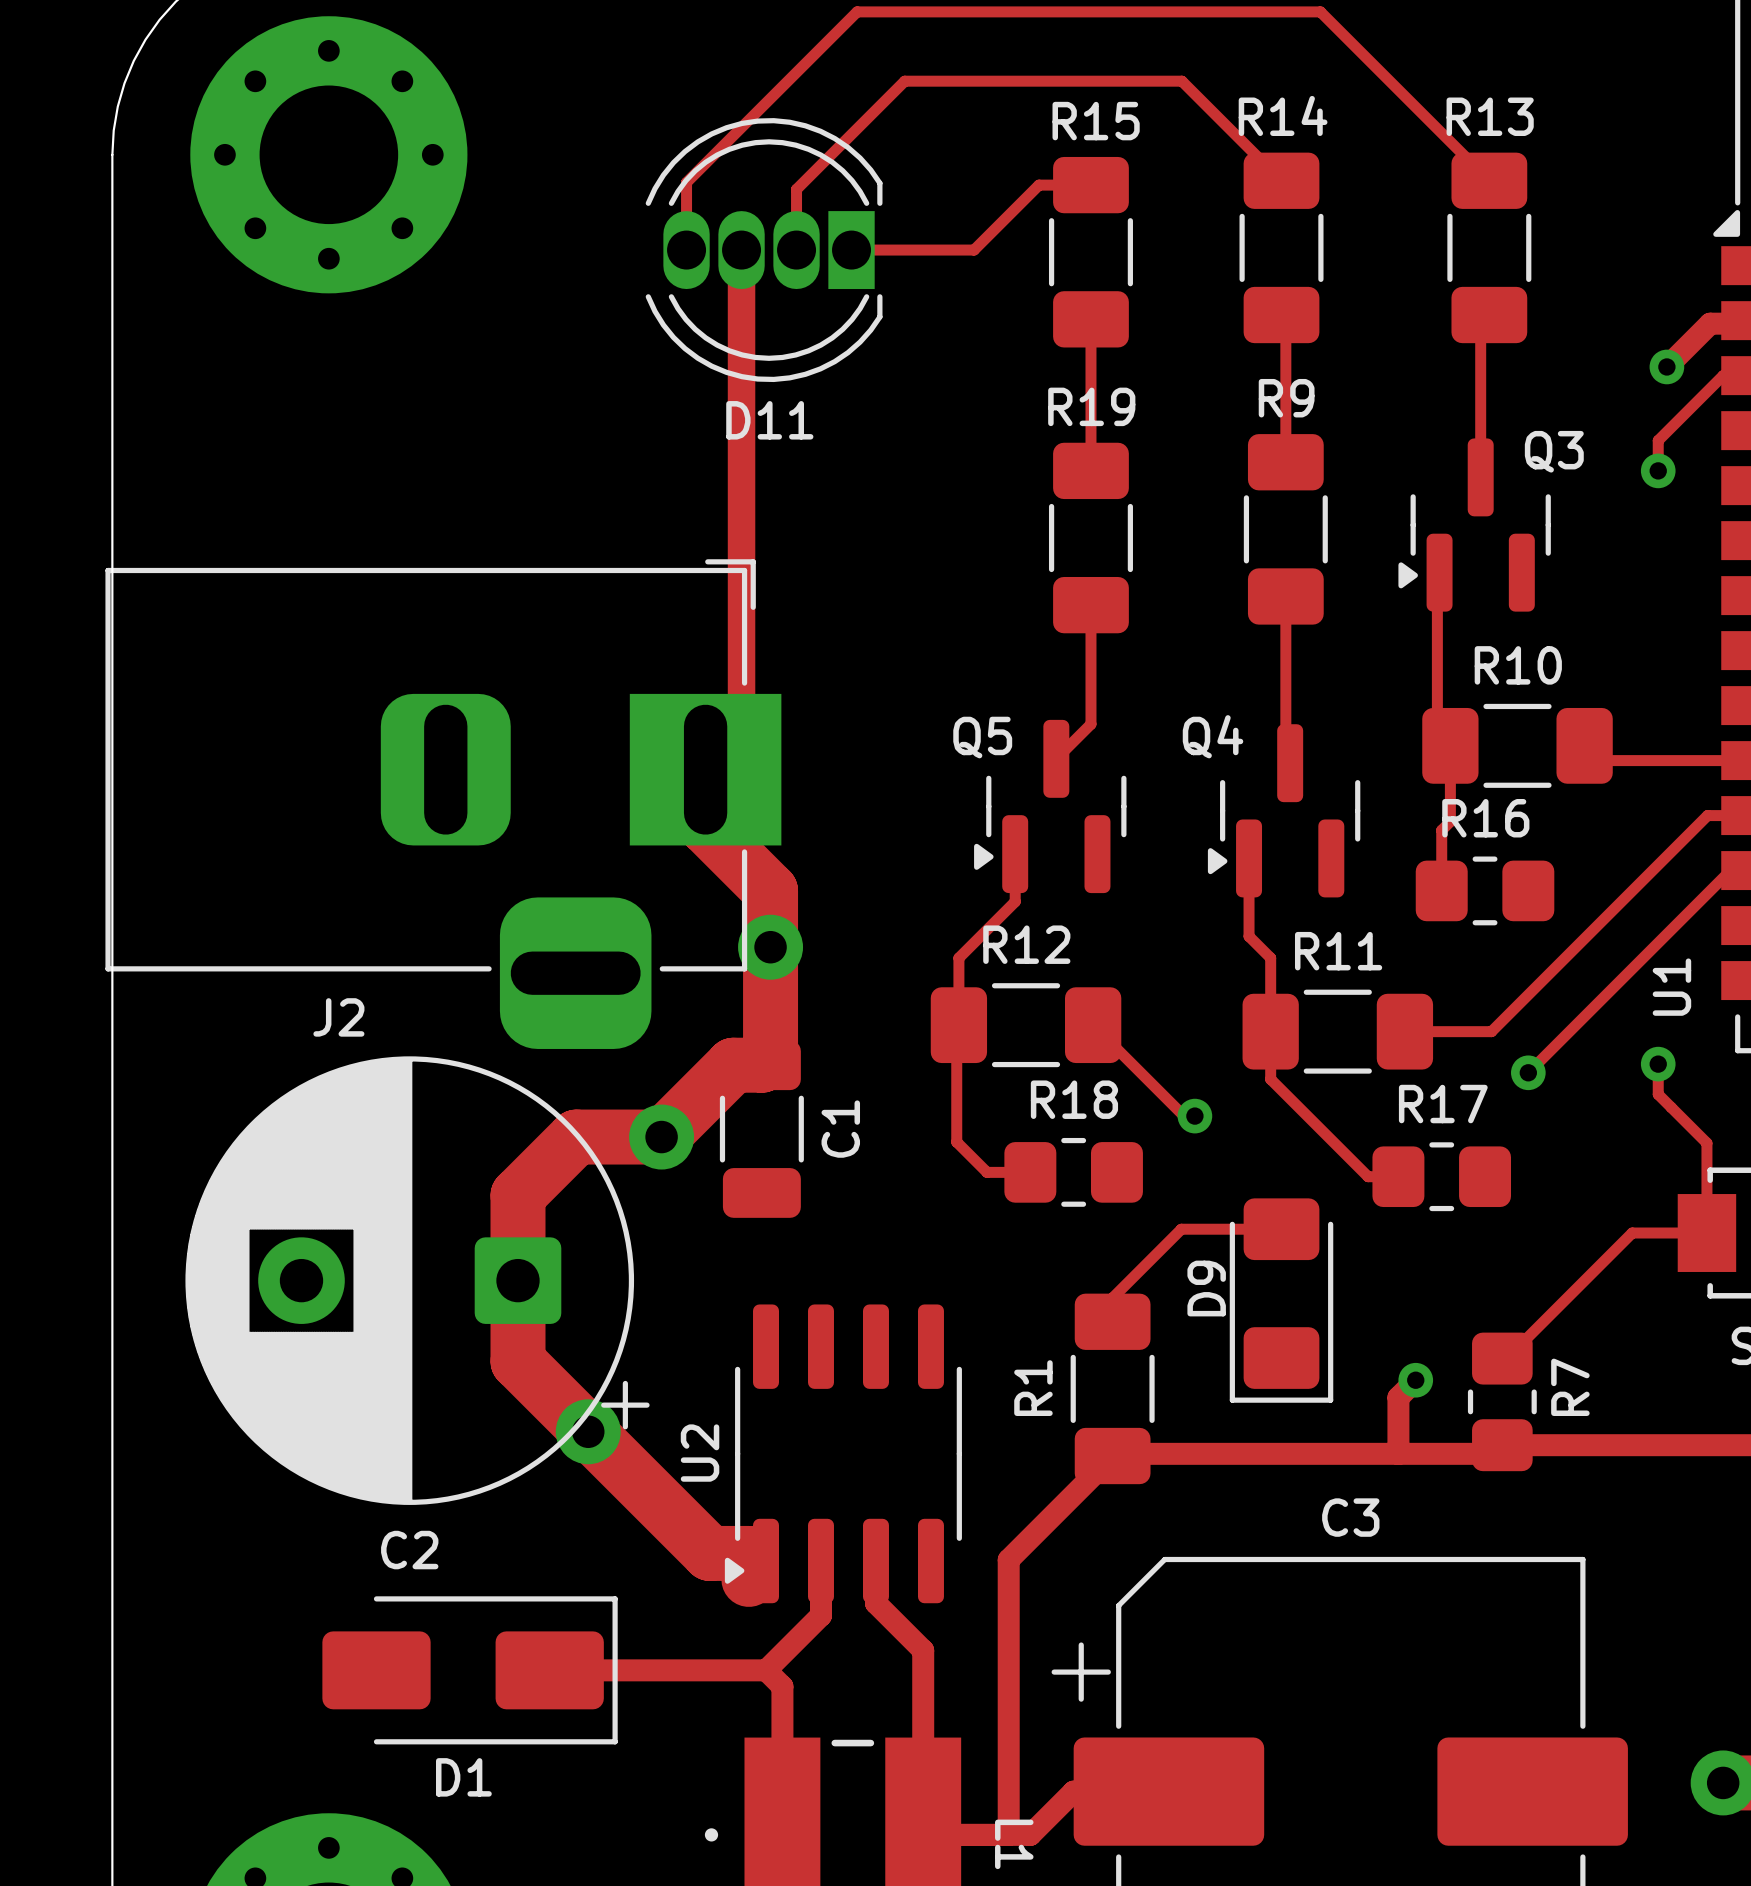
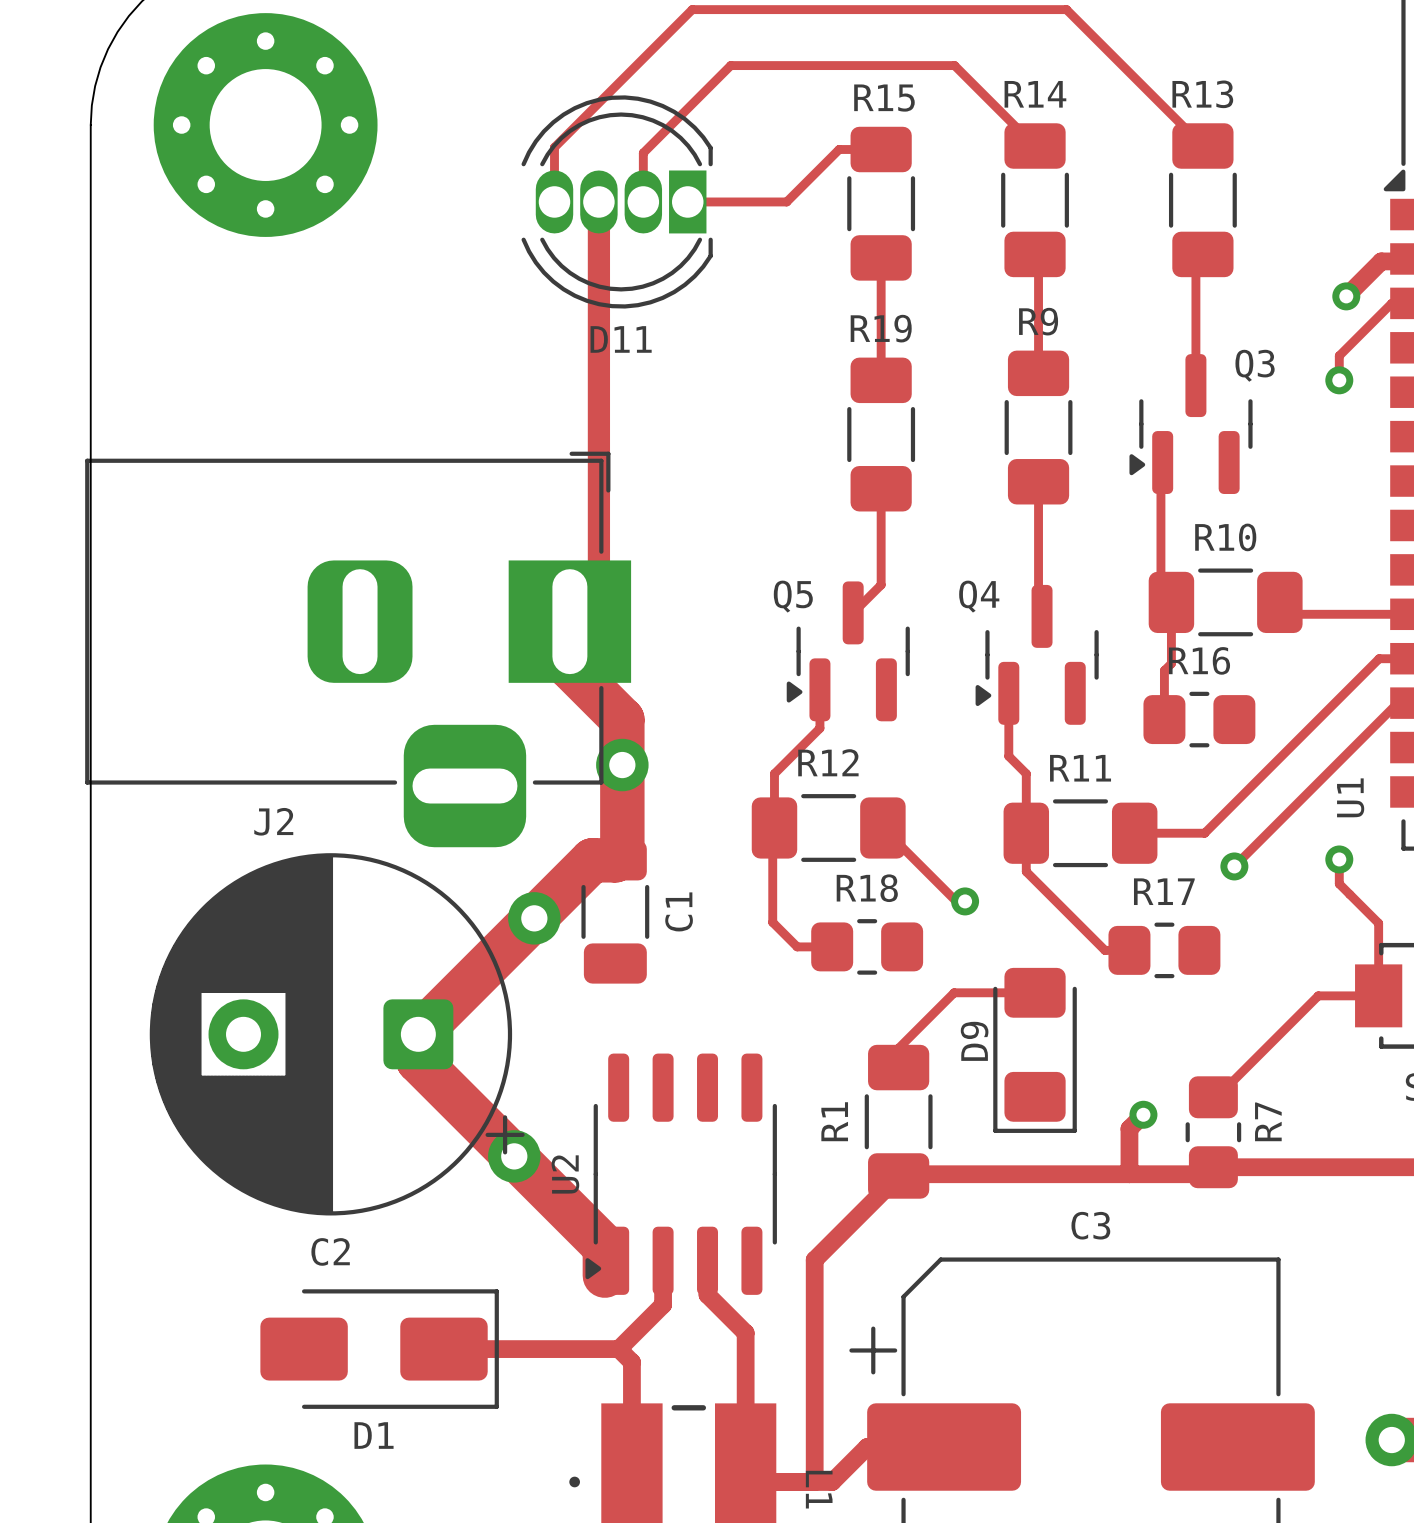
track: (661, 1137) (576, 1137) (518, 1195) (518, 1280) -> (534, 918) (418, 1034)
track: (518, 1313) (518, 1361) (709, 1553) (748, 1553) -> (418, 1060) (513, 1156)
via position: (588, 1431) -> (514, 1156)
track: none -> (514, 1156) (604, 1246) (604, 1254)

